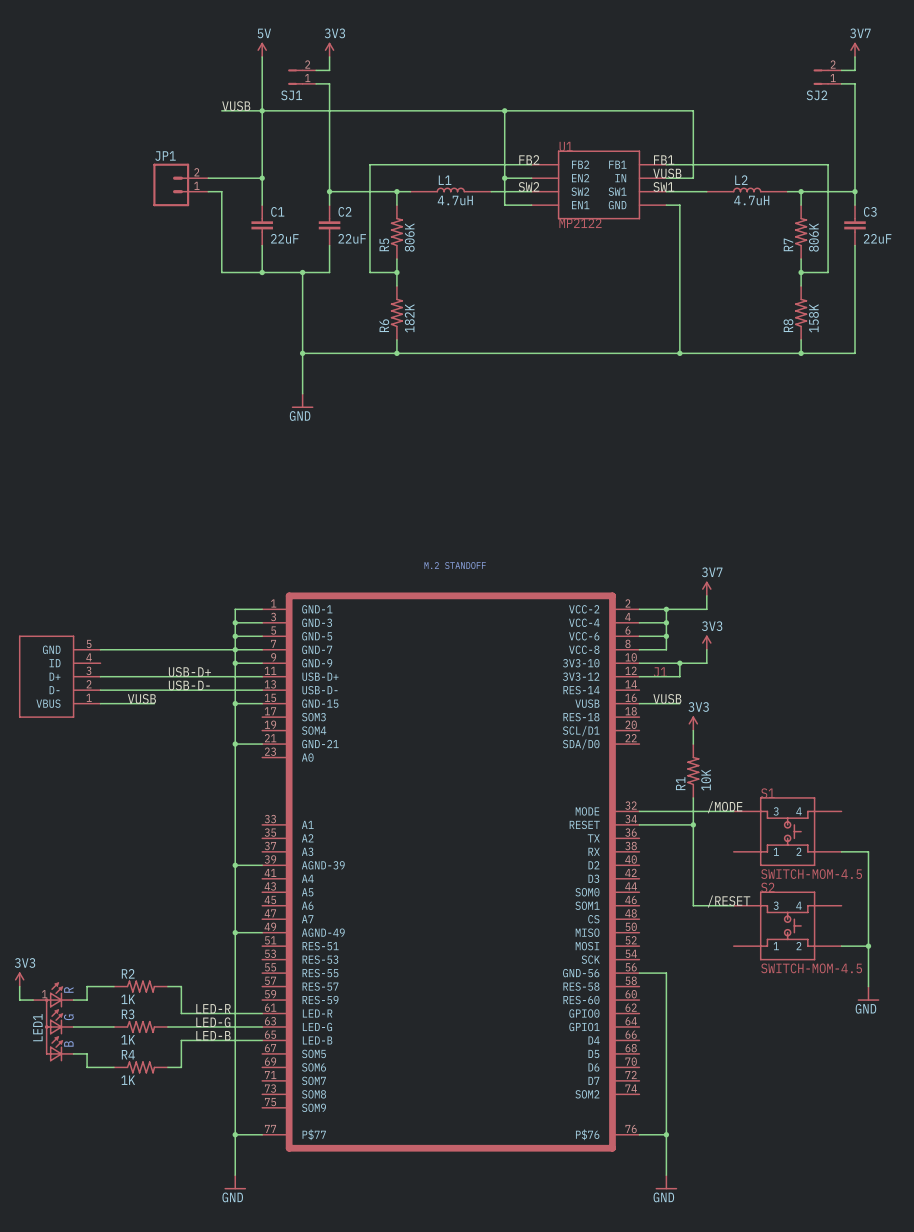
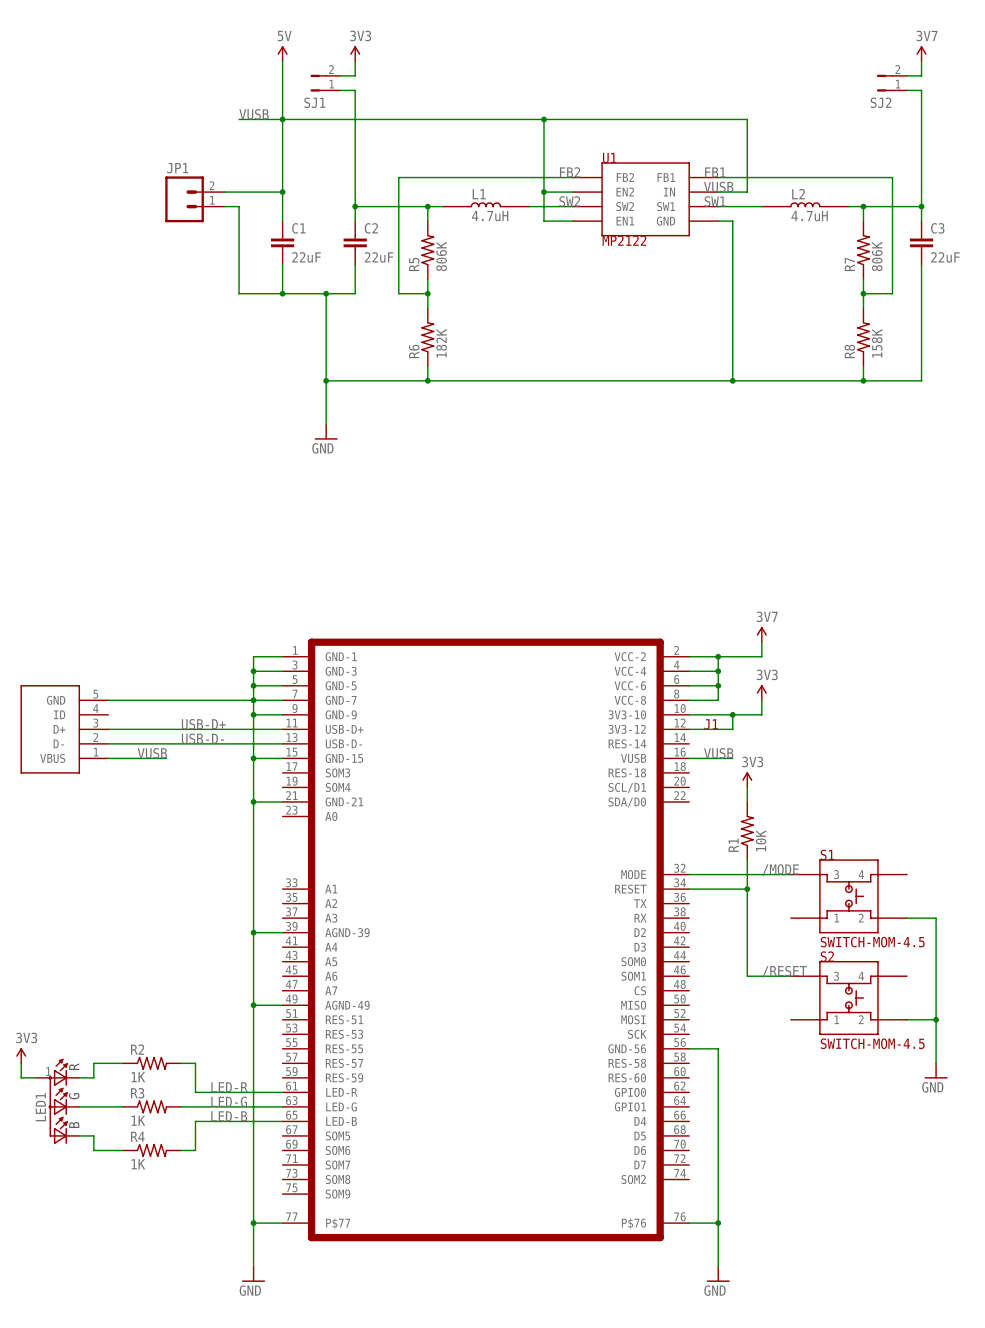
part: (455, 565) -> none

